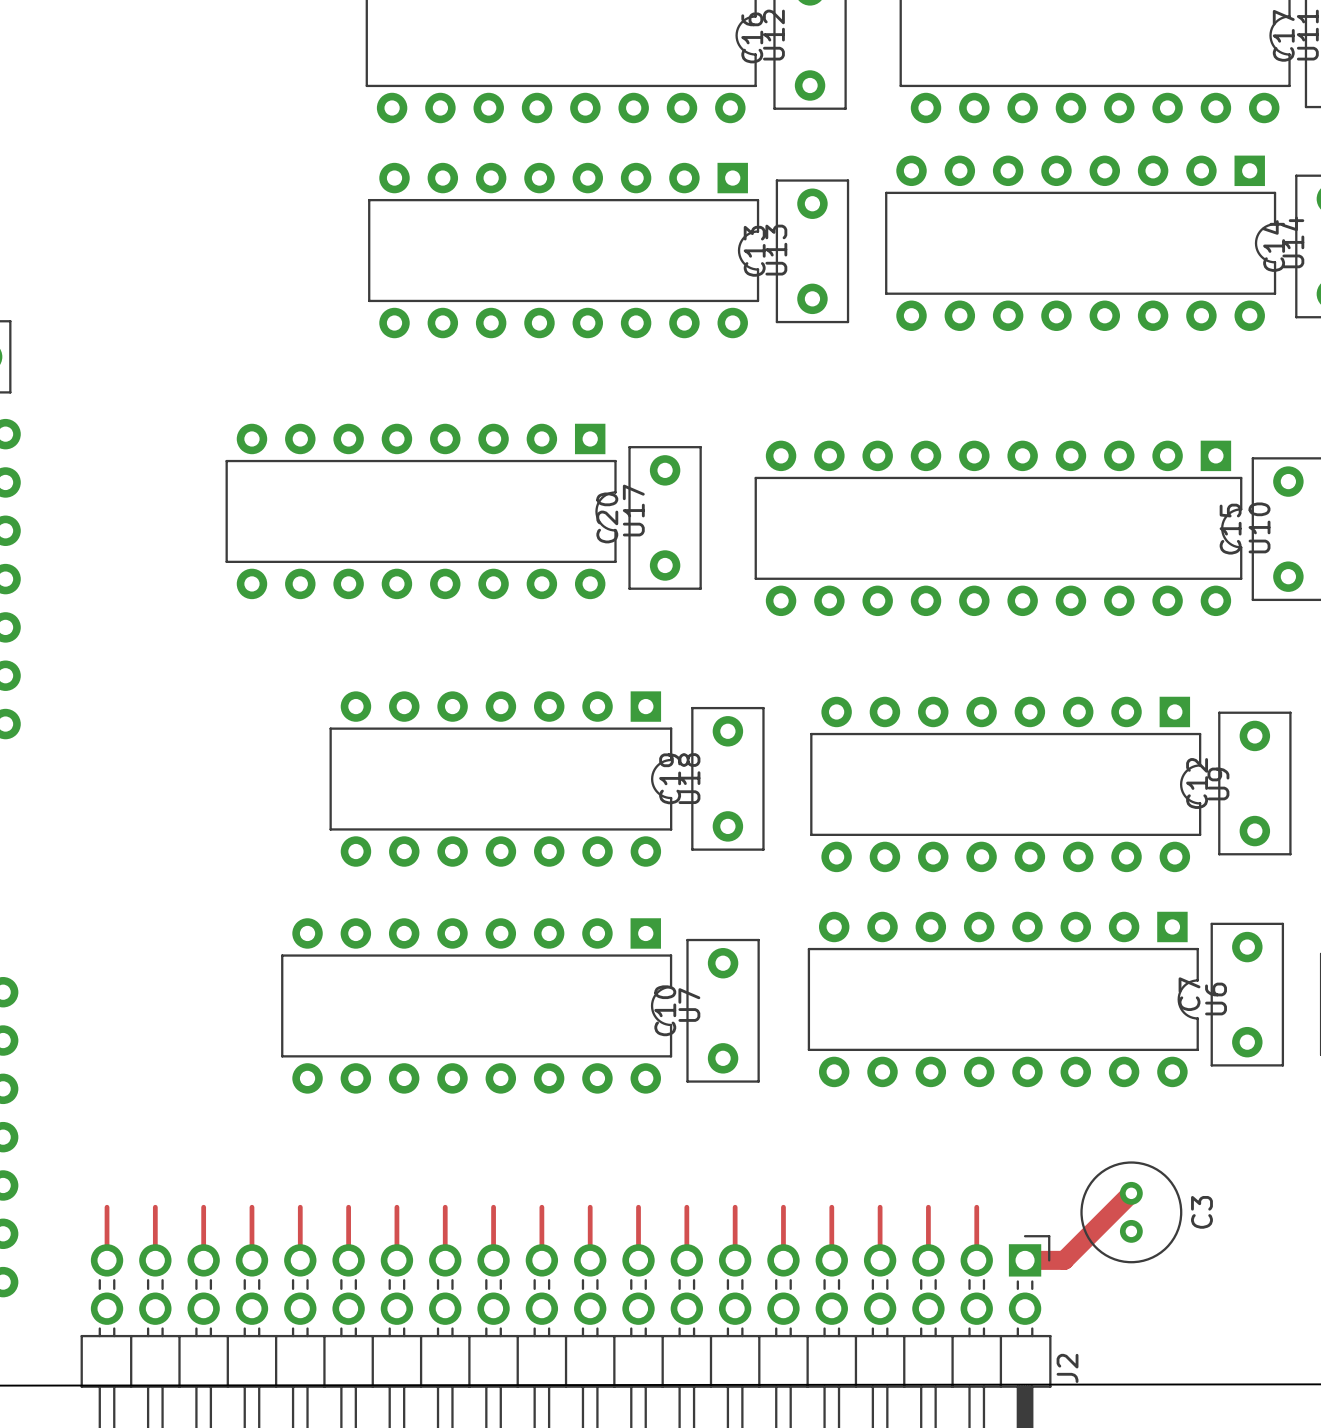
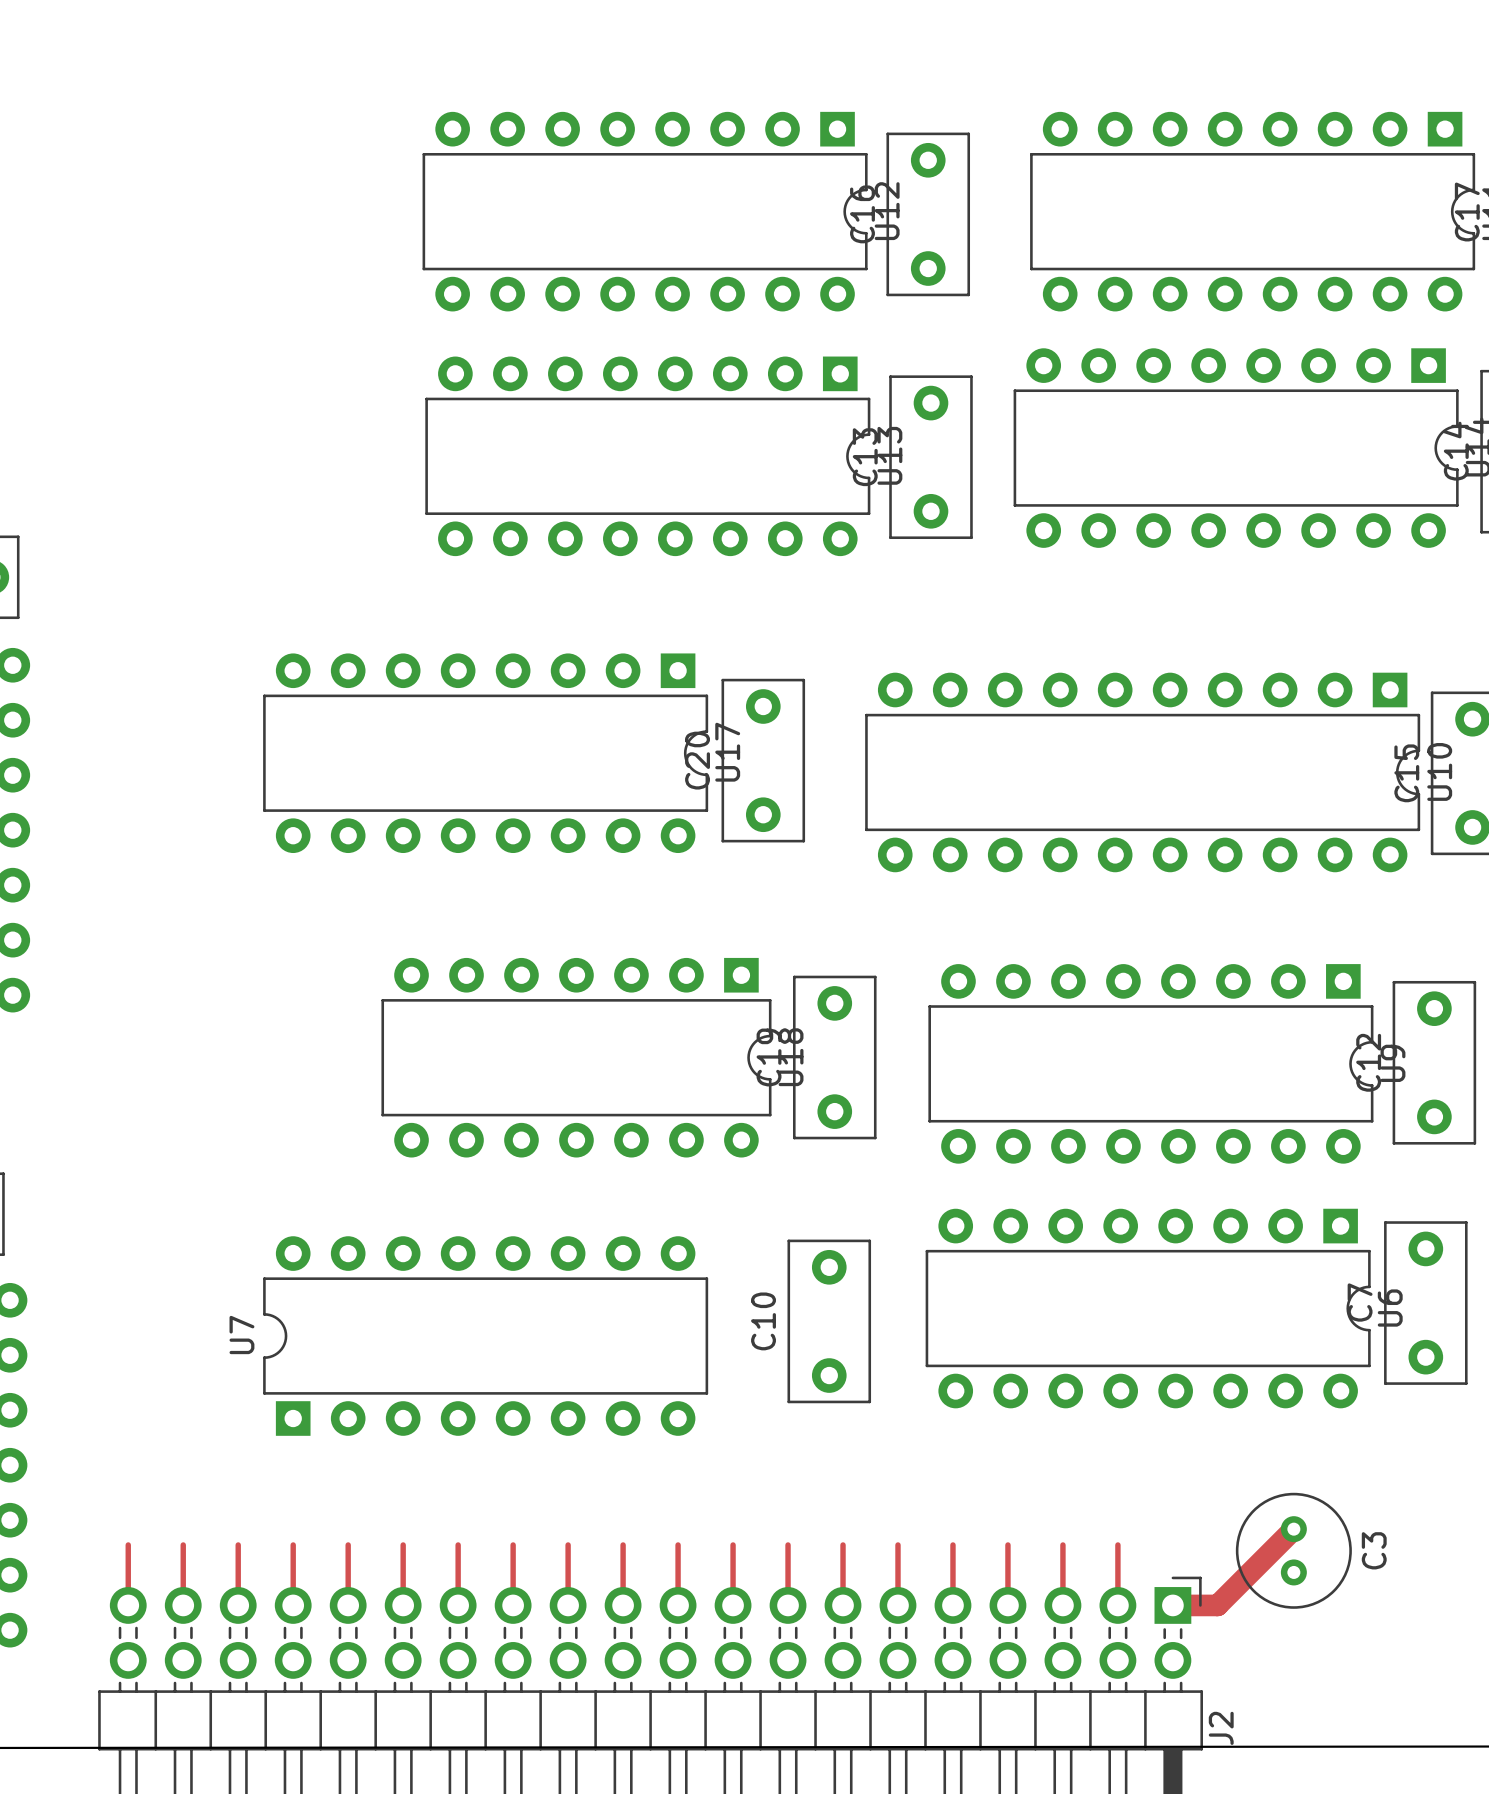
U7 rotation: 0° (476, 1005) -> 180° (485, 1336)

